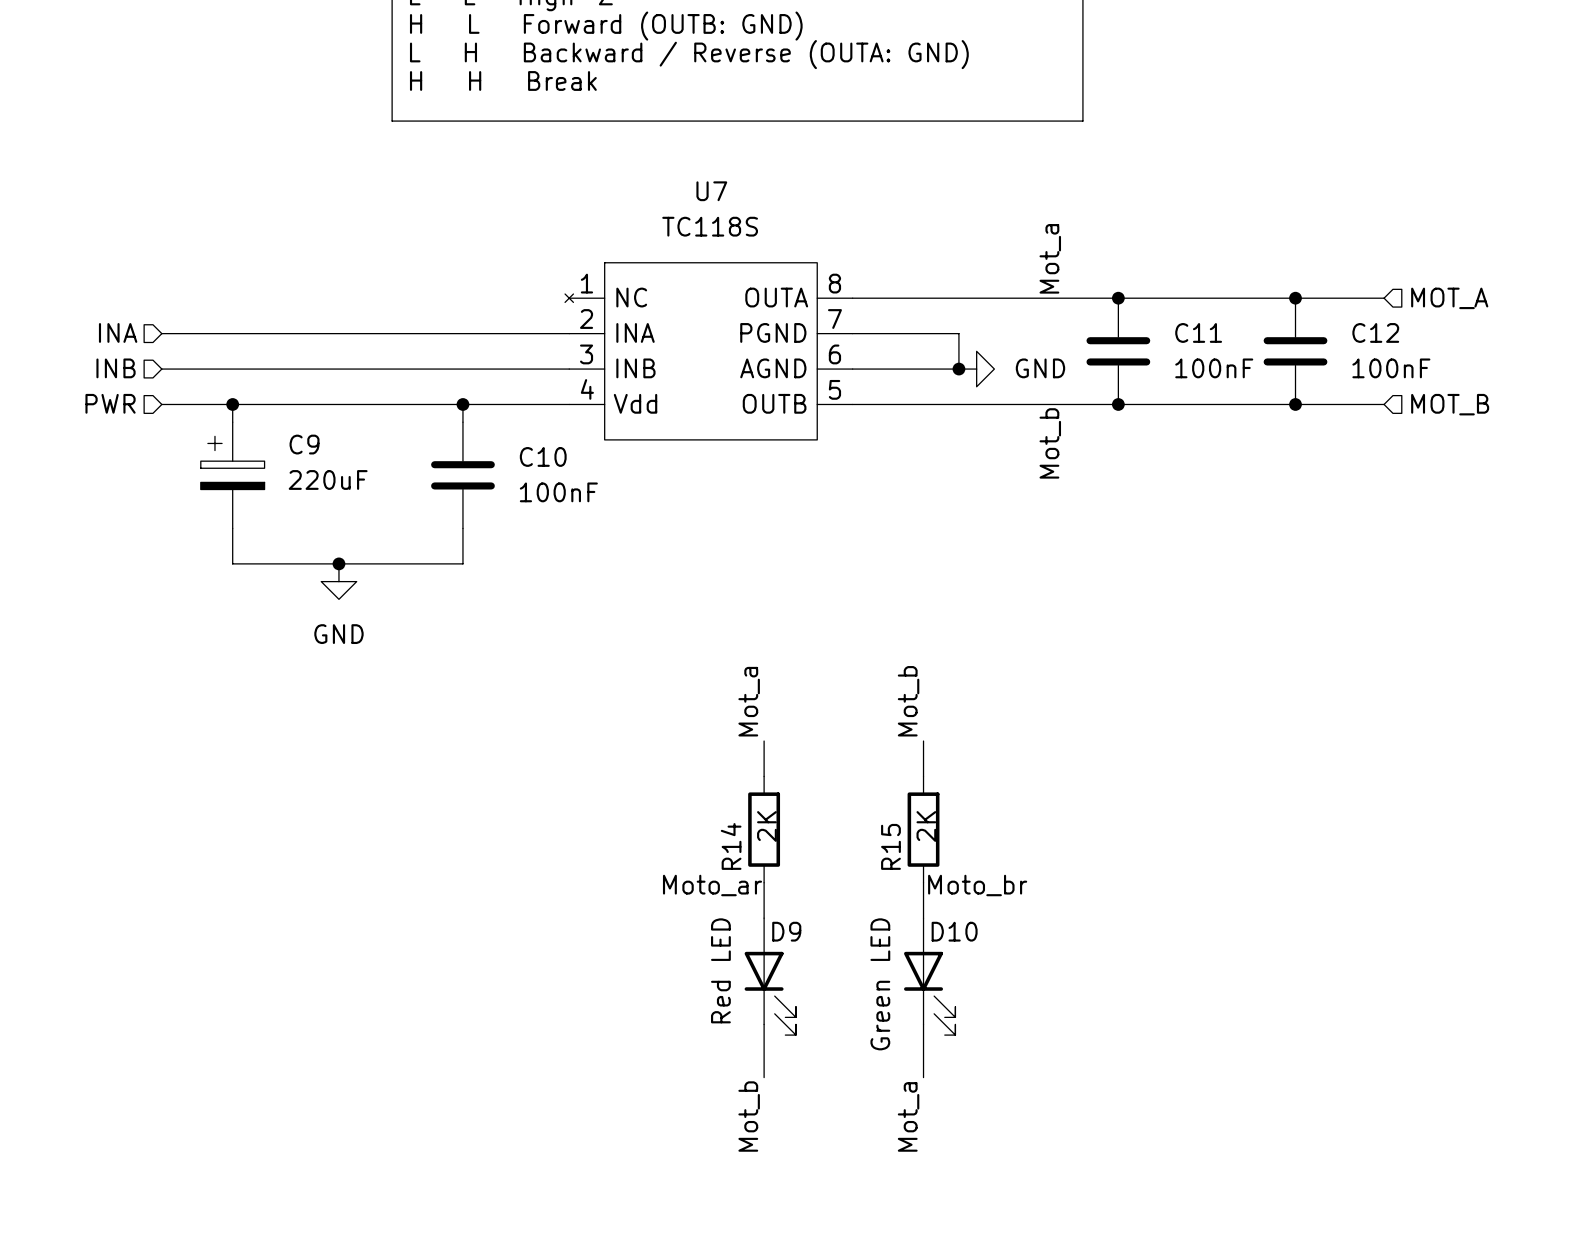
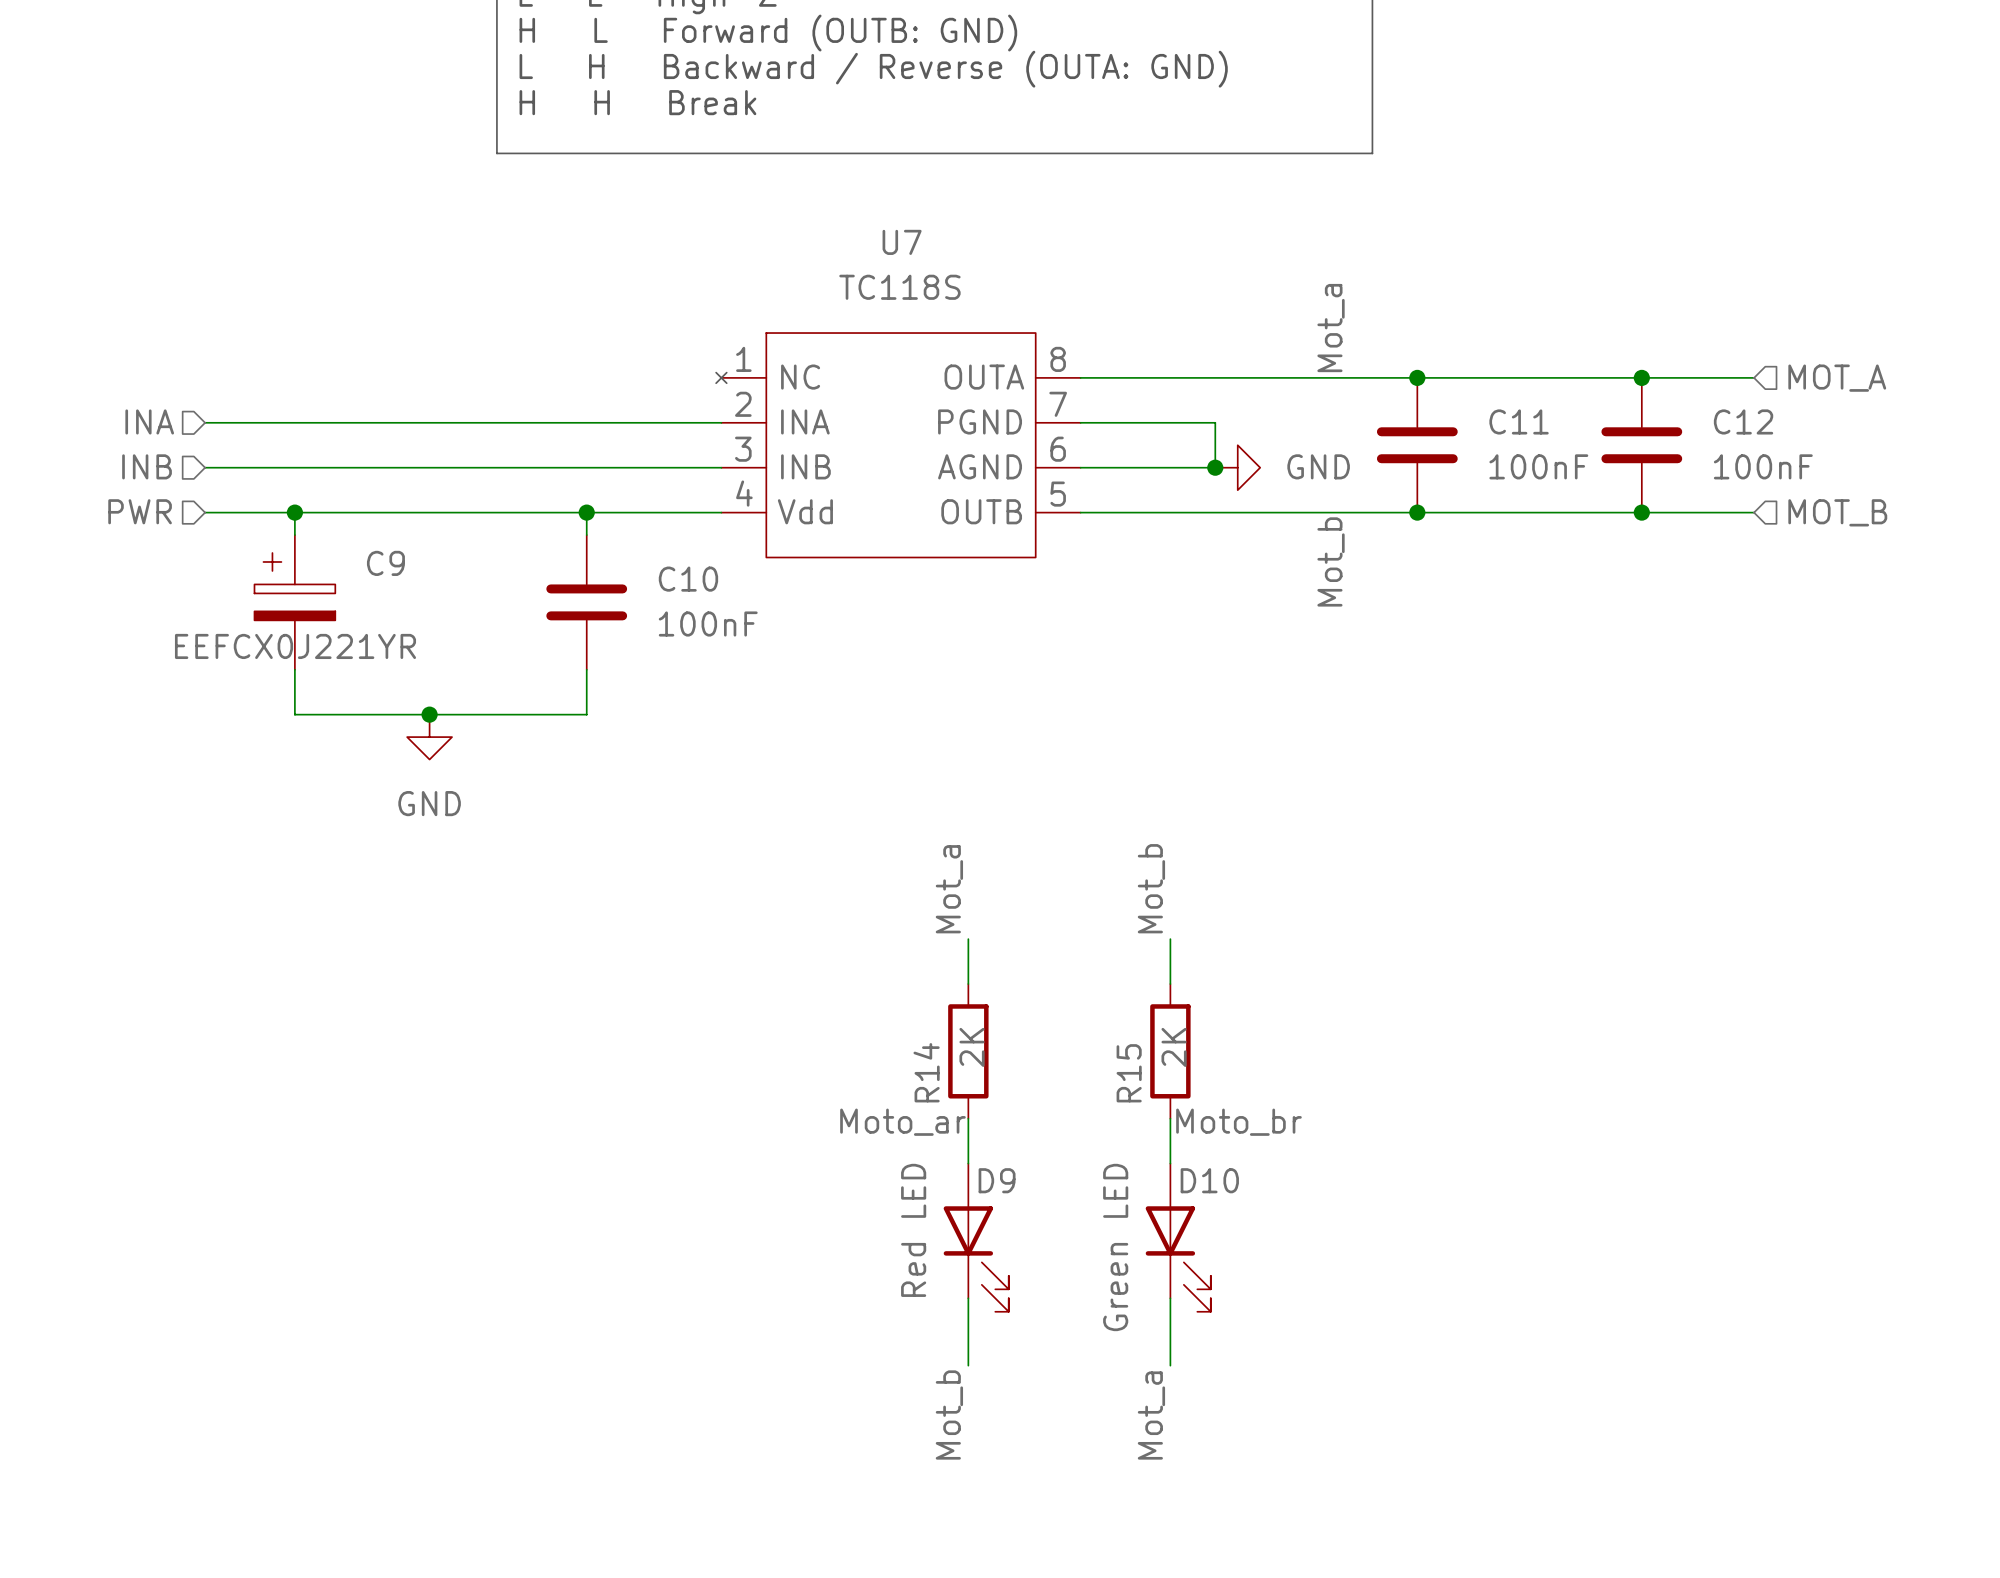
C9 value: 220uF (328, 479) -> EEFCX0J221YR (295, 646)

